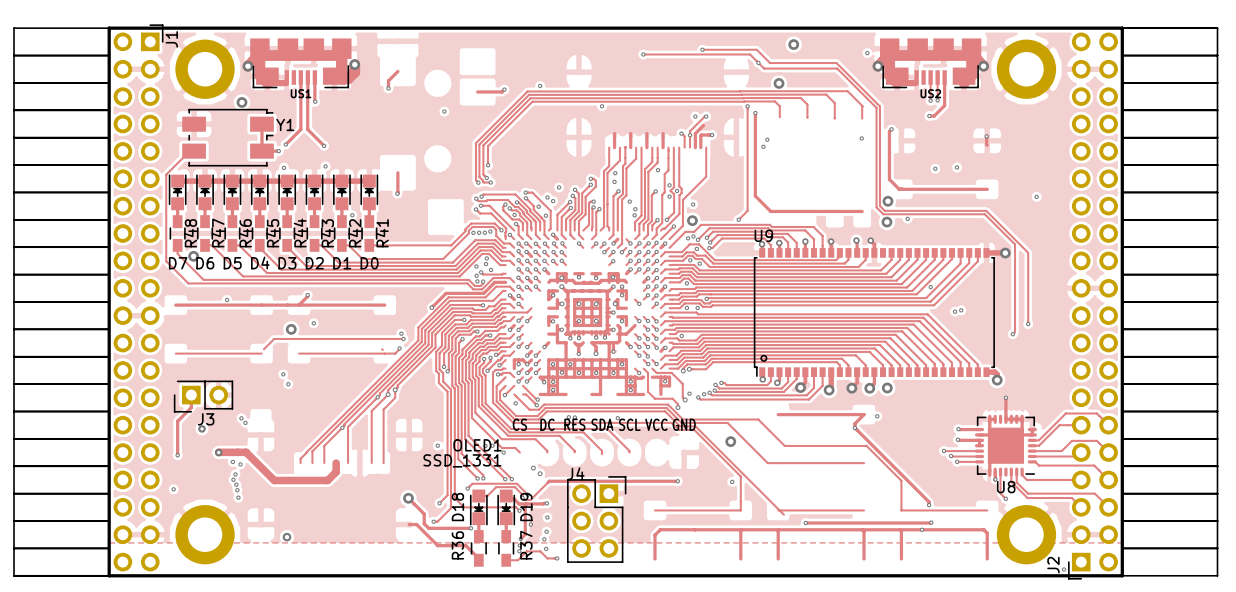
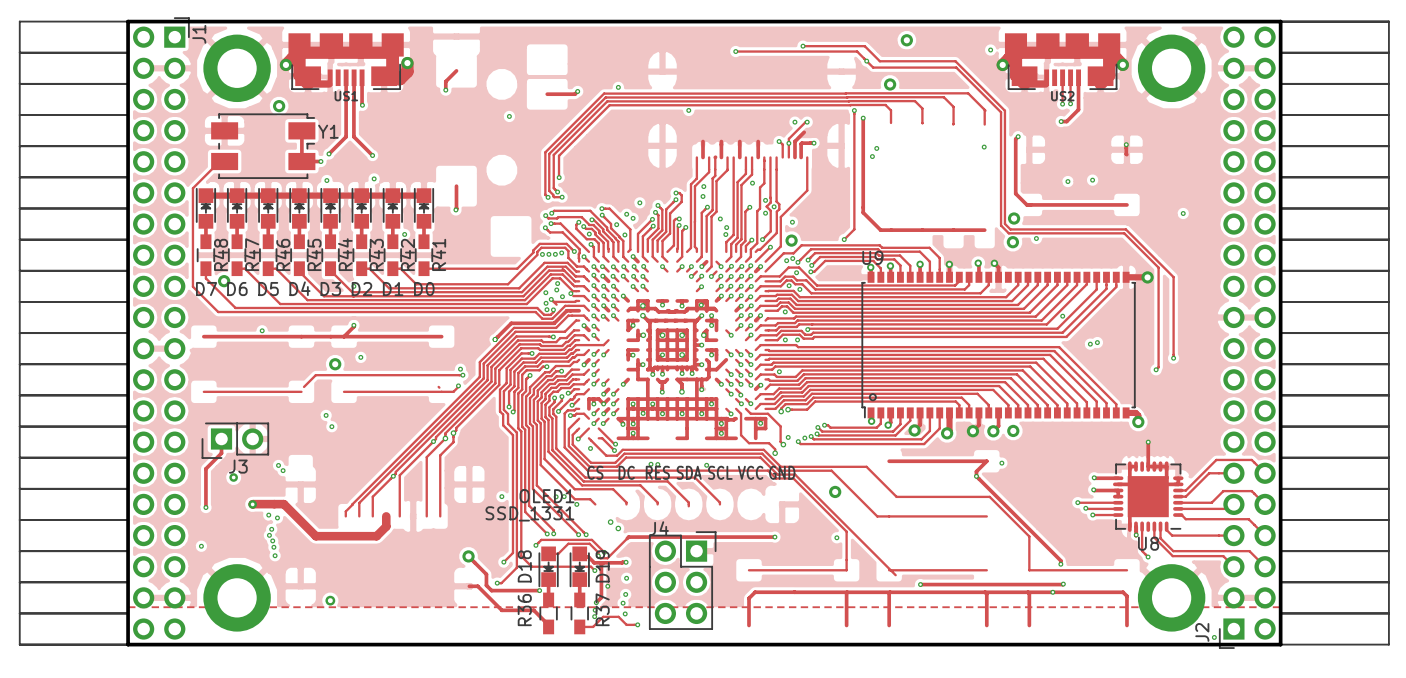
track: (544, 260) (548, 265) -> none
via position: (544, 260) -> (570, 293)
track: none -> (573, 296) (584, 296) (588, 300)

